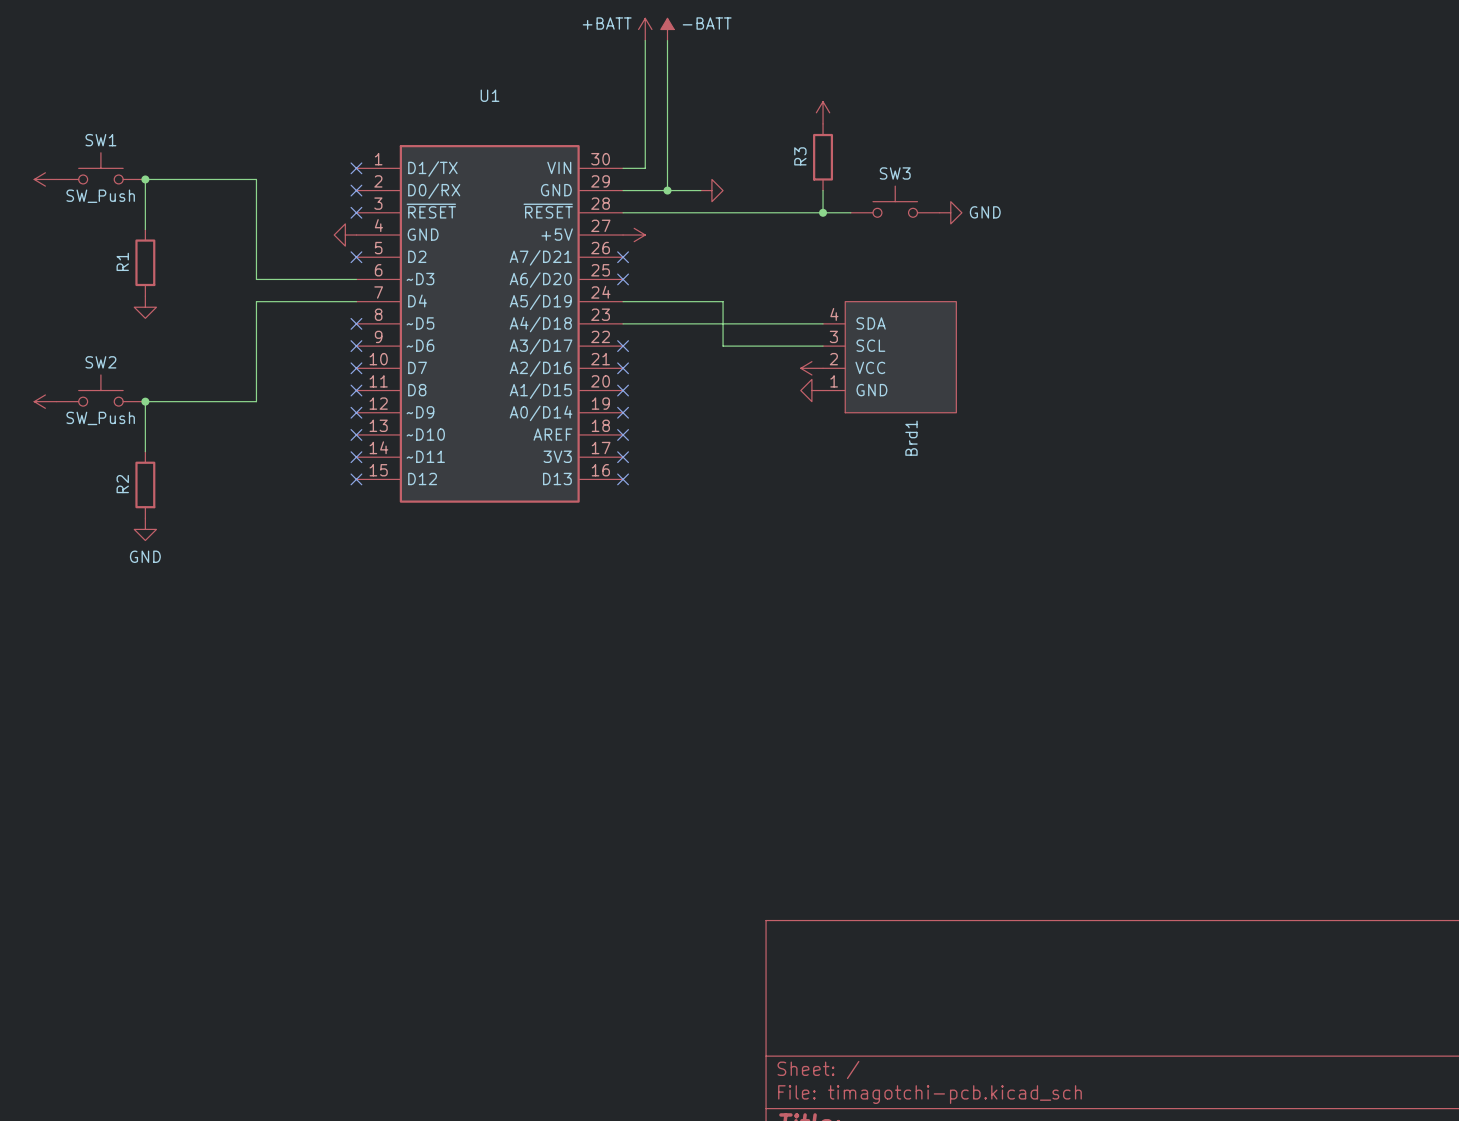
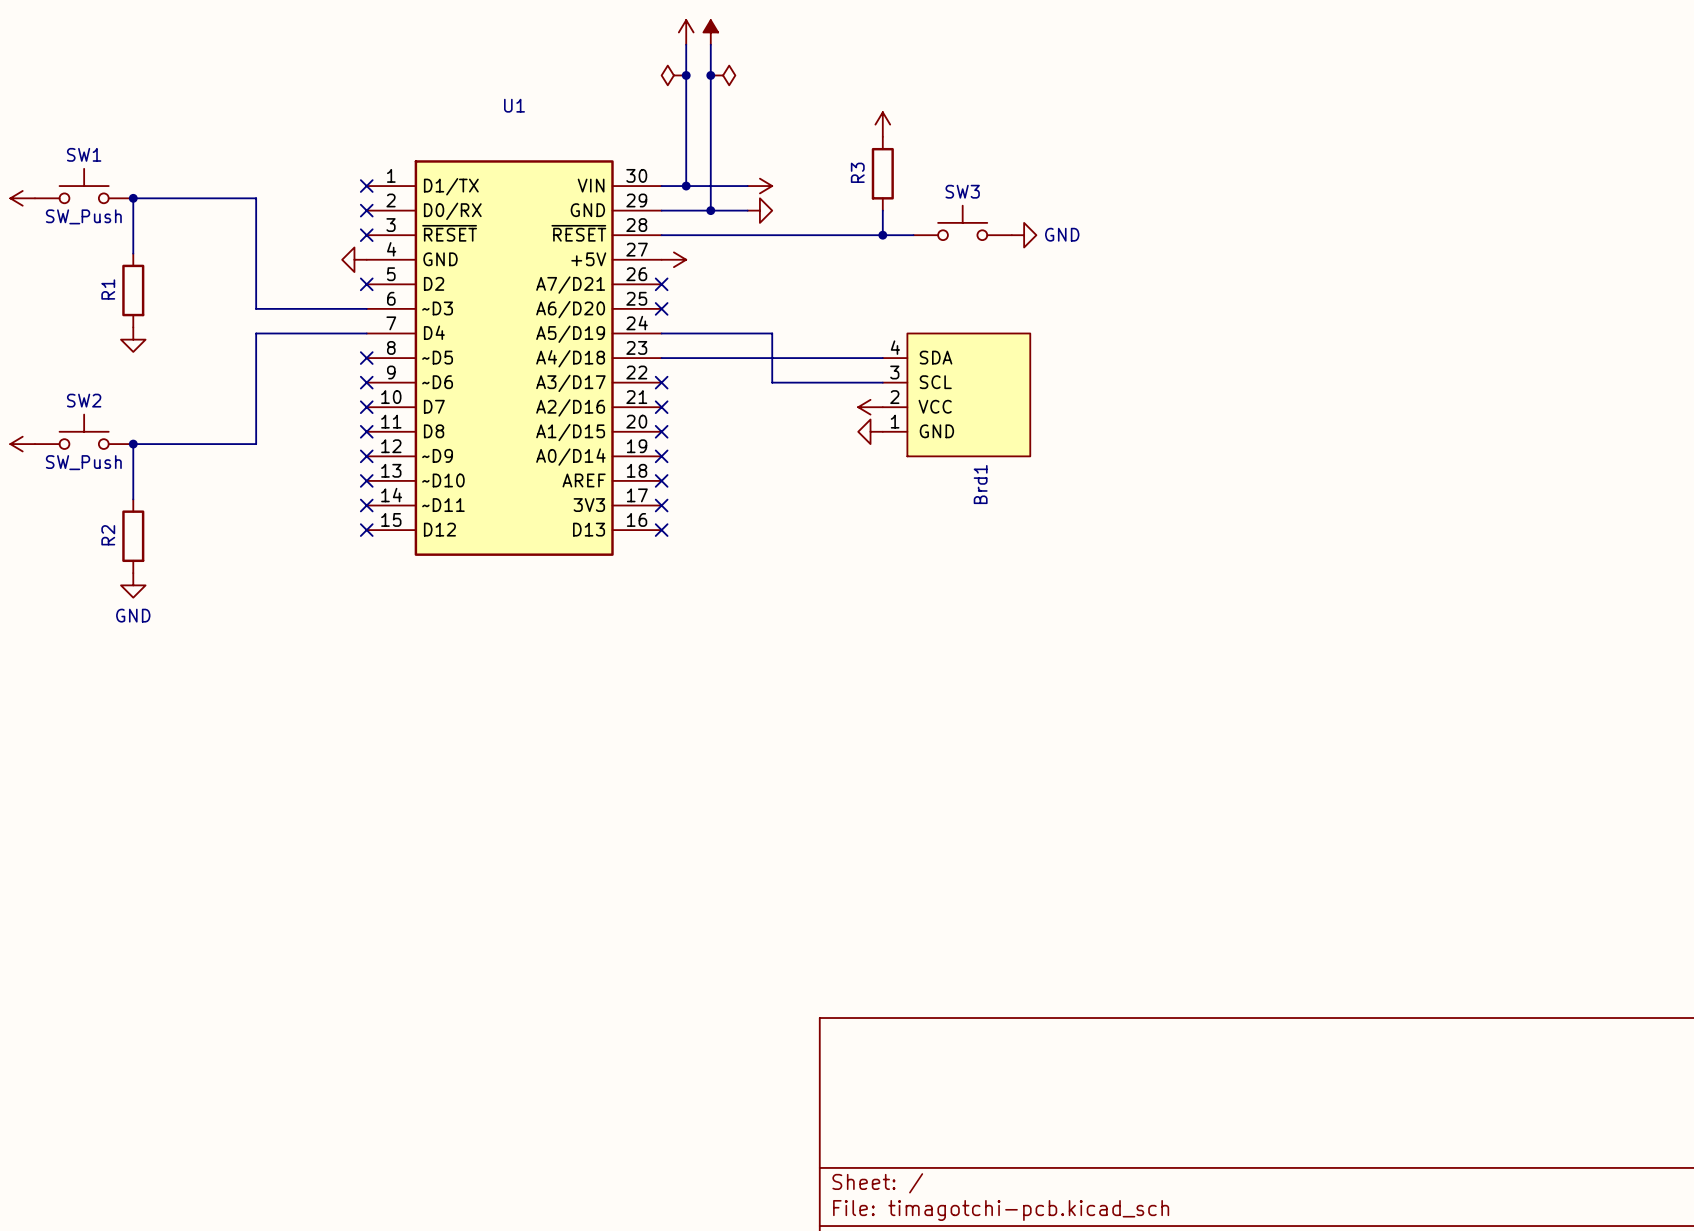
power symbol text: +BATT (607, 23) -> none
power symbol text: -BATT (707, 23) -> none
power symbol: none -> (673, 75)
junction: none -> (686, 75)
junction: none -> (710, 75)
power symbol: none -> (723, 75)
wire: none -> (686, 186) (747, 186)
junction: none -> (686, 186)
power symbol: none -> (759, 186)

